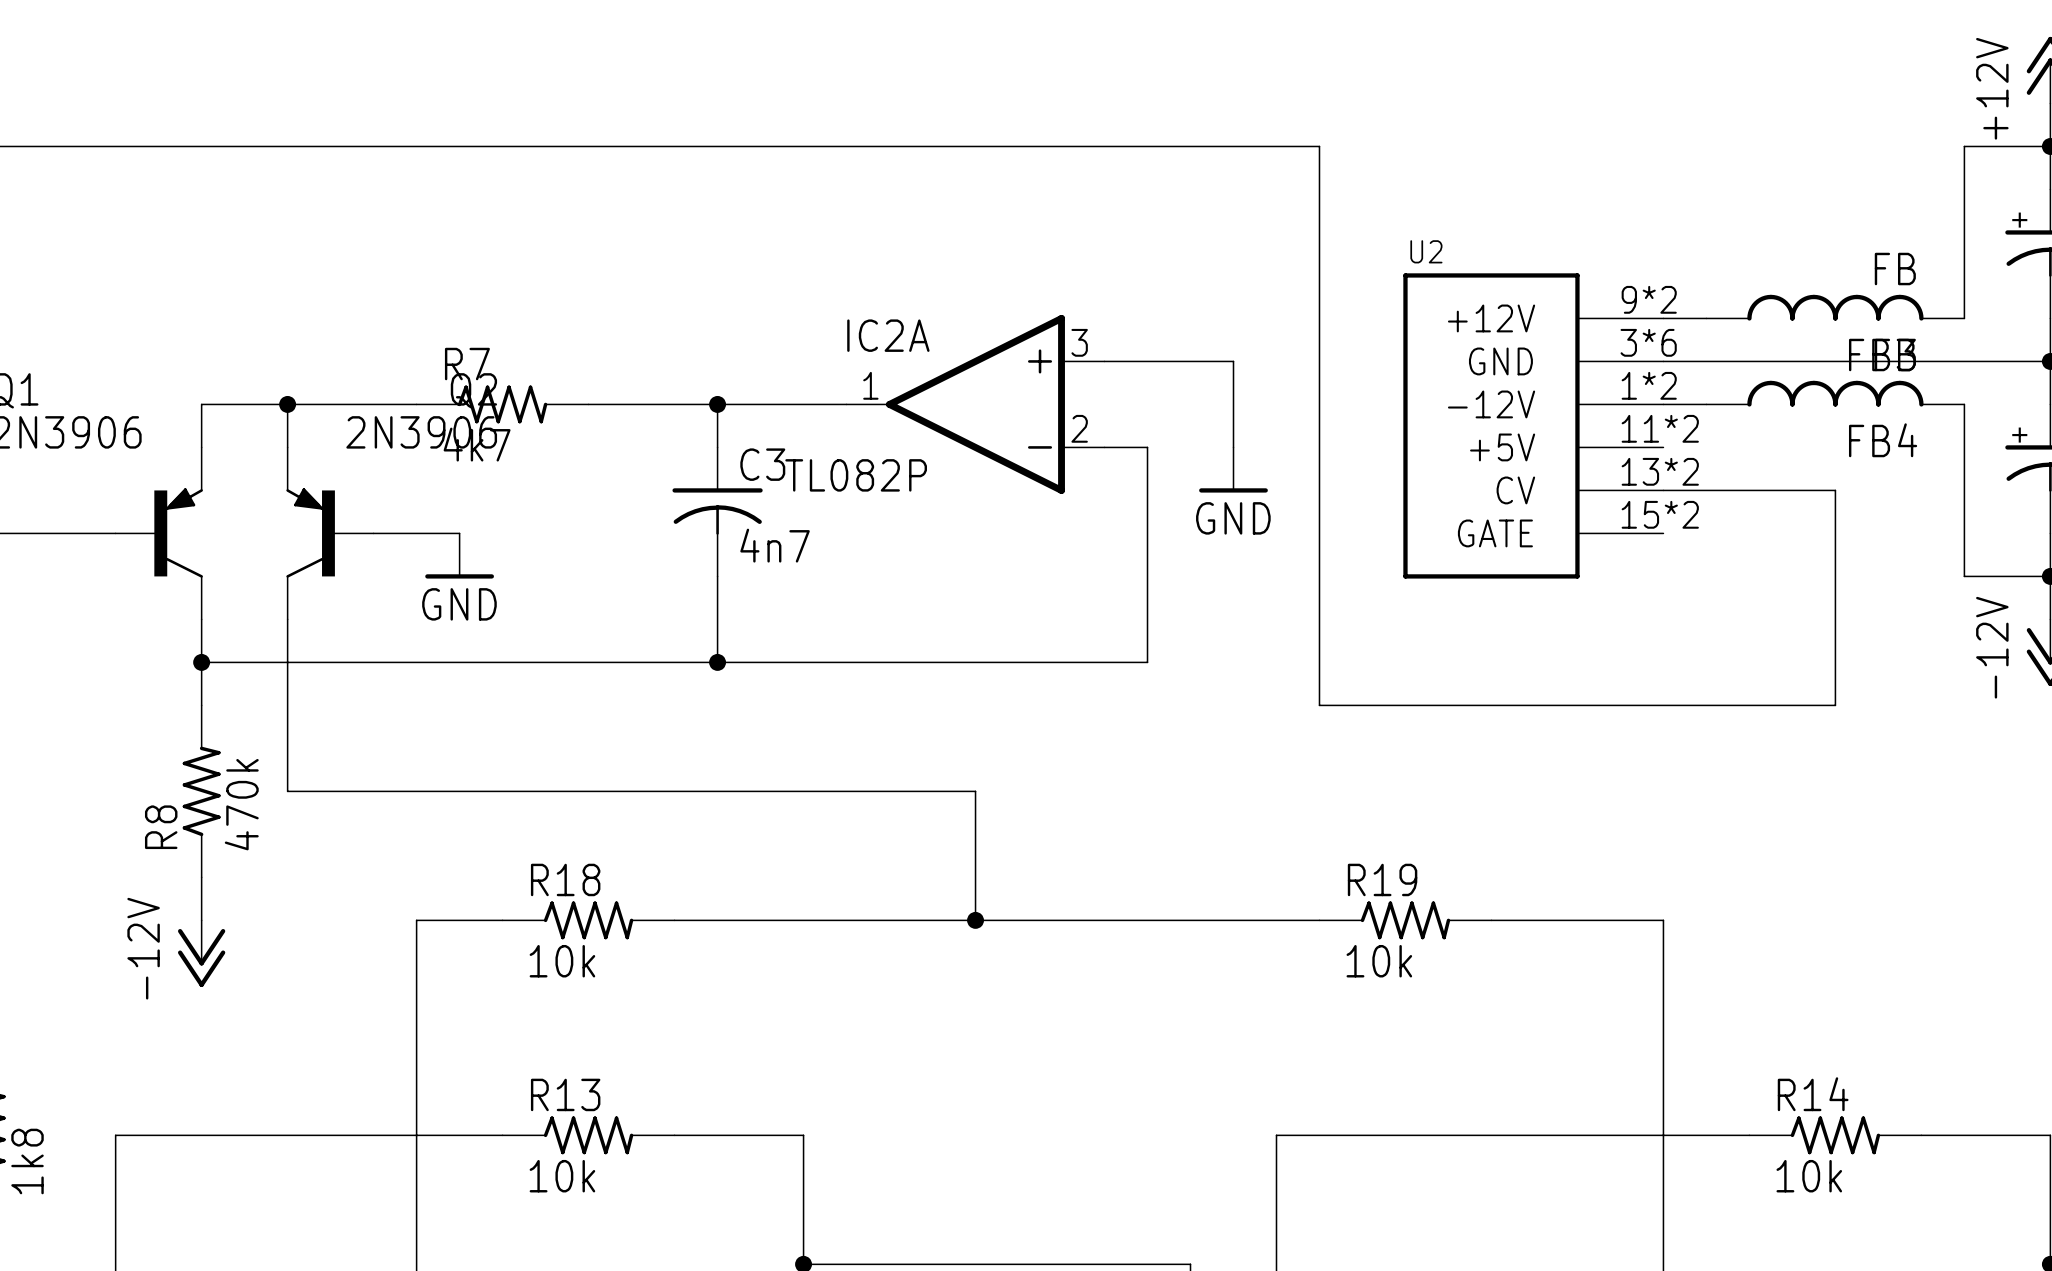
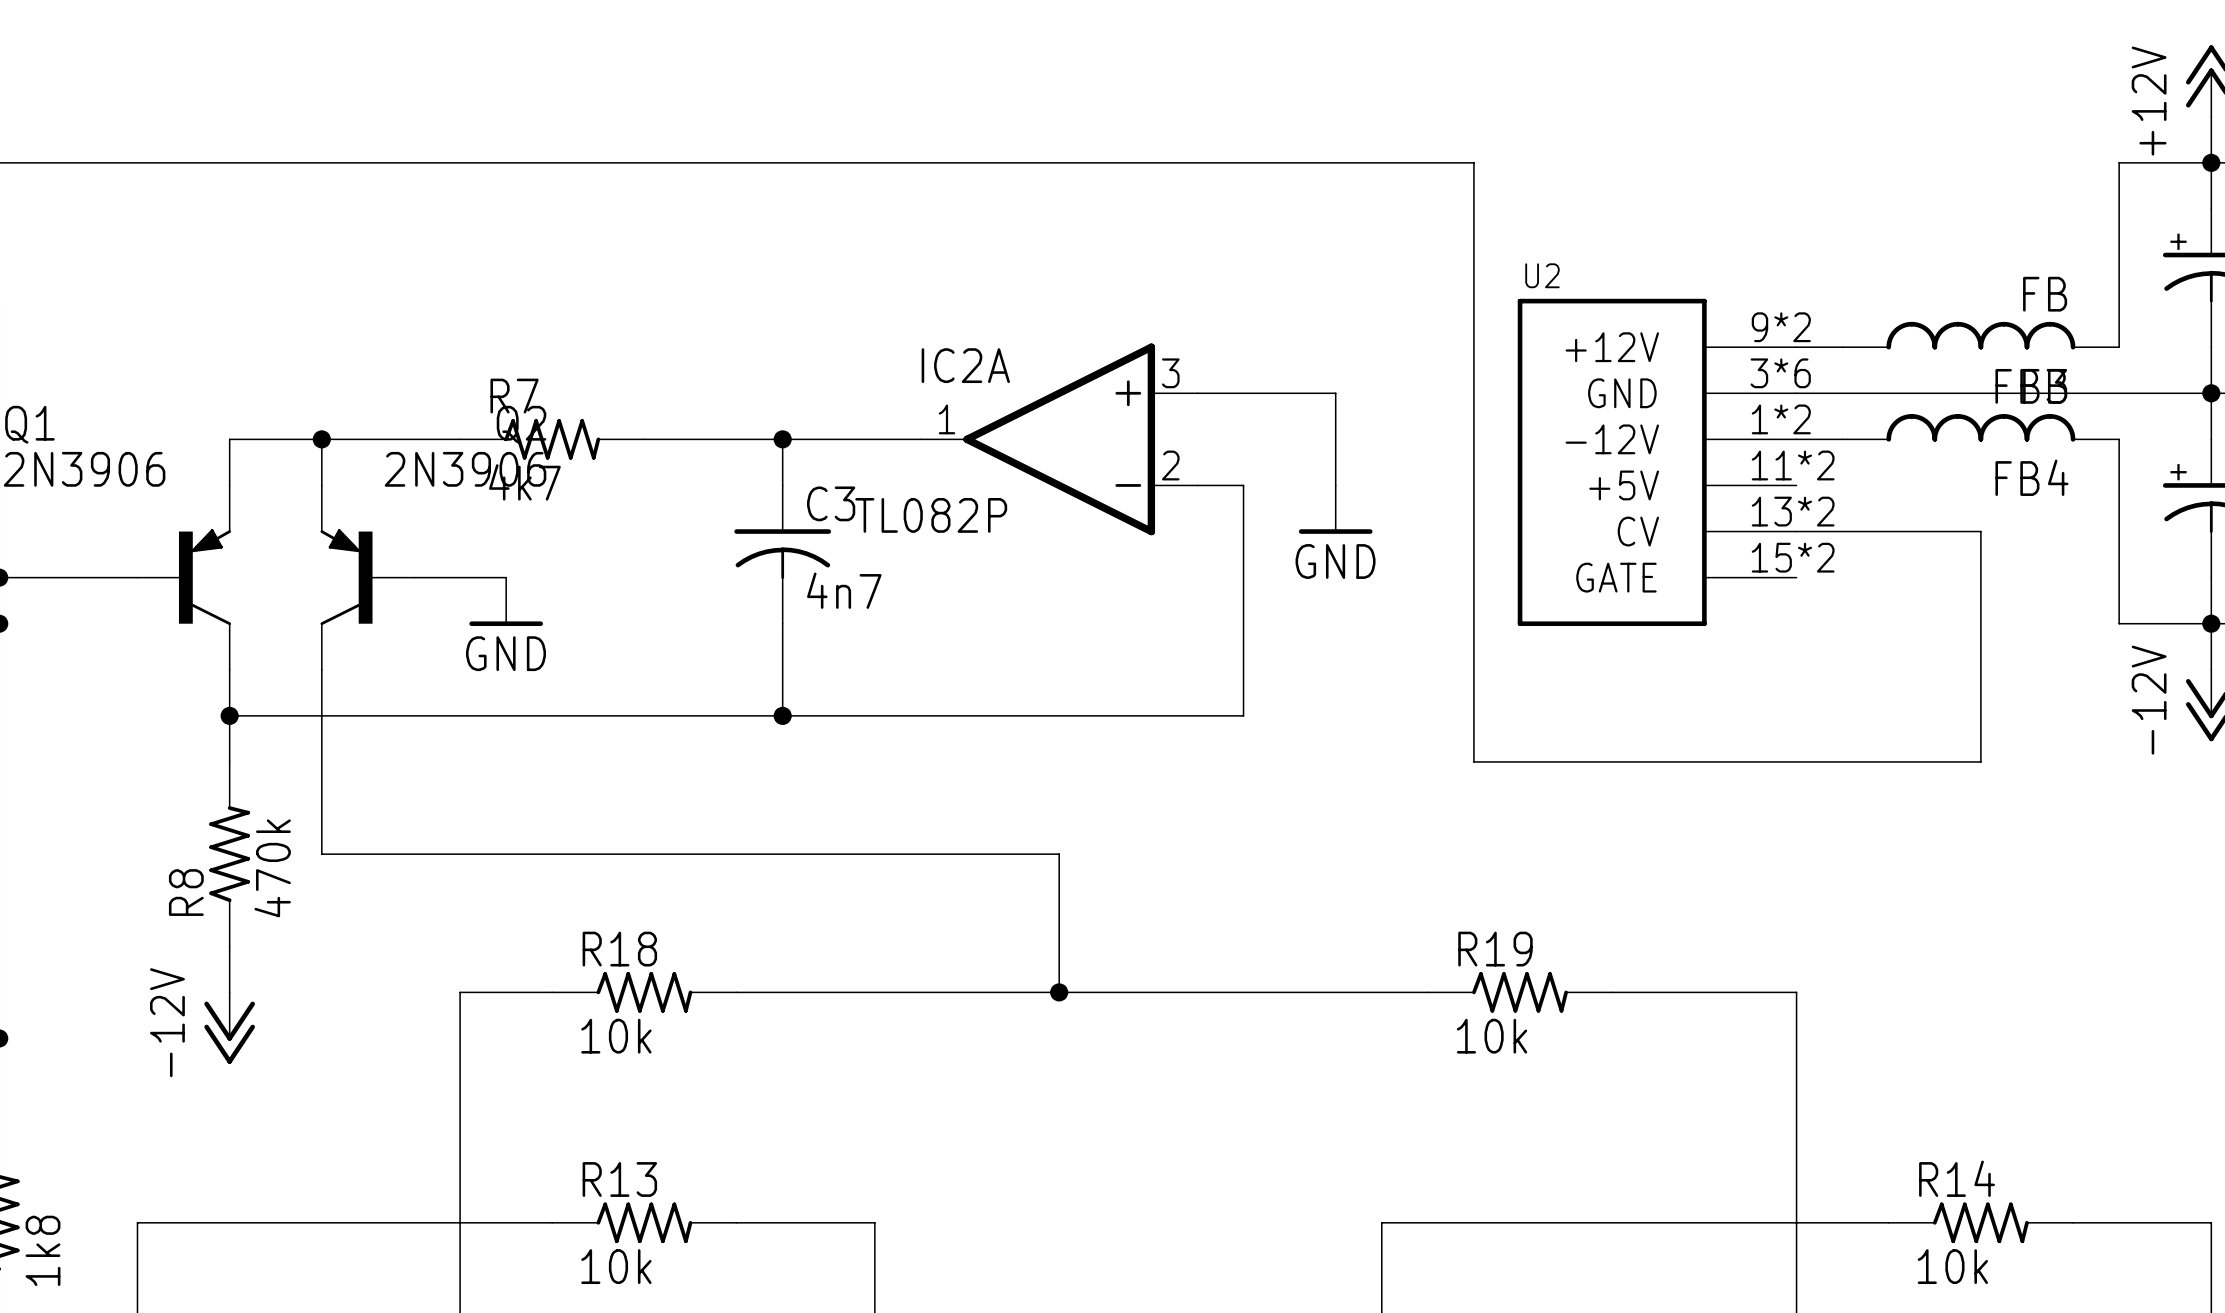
wire: (1319, 146) (1319, 705) (1362, 705) -> (1427, 162) (1473, 162) (1473, 761)

